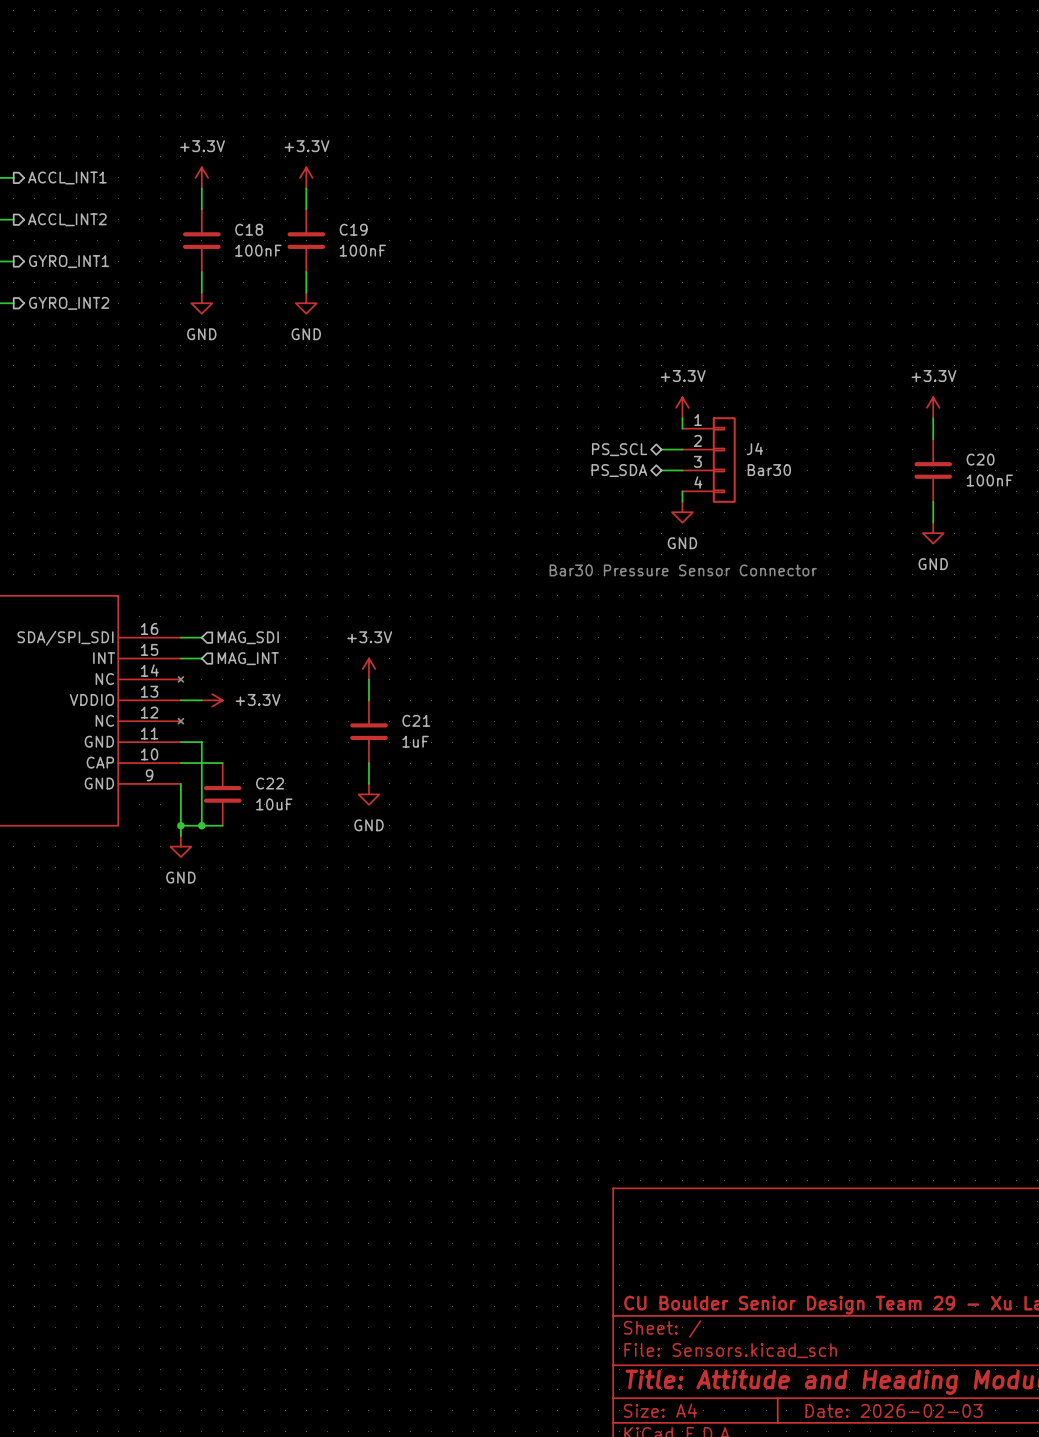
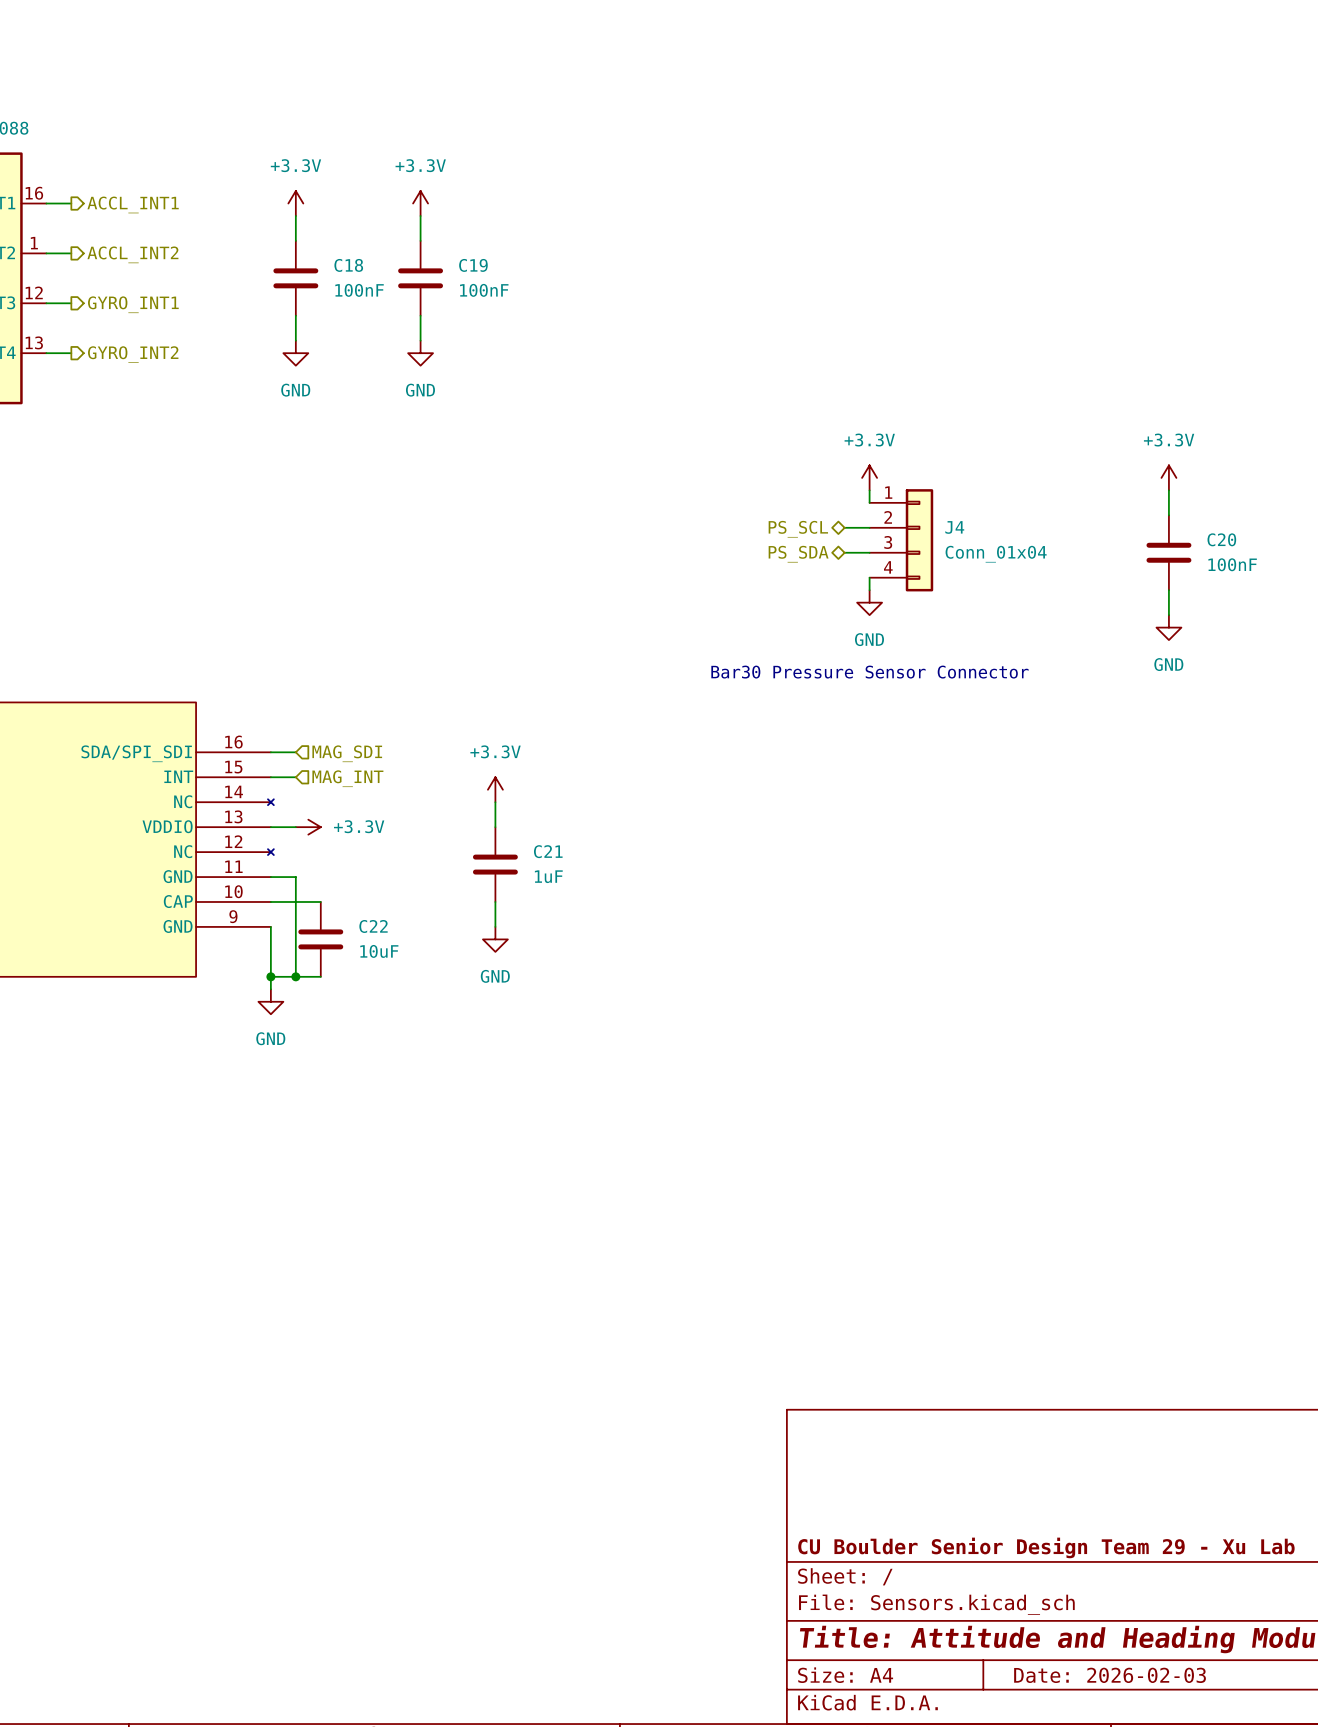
J4 value: Bar30 (769, 470) -> Conn_01x04 (996, 554)

